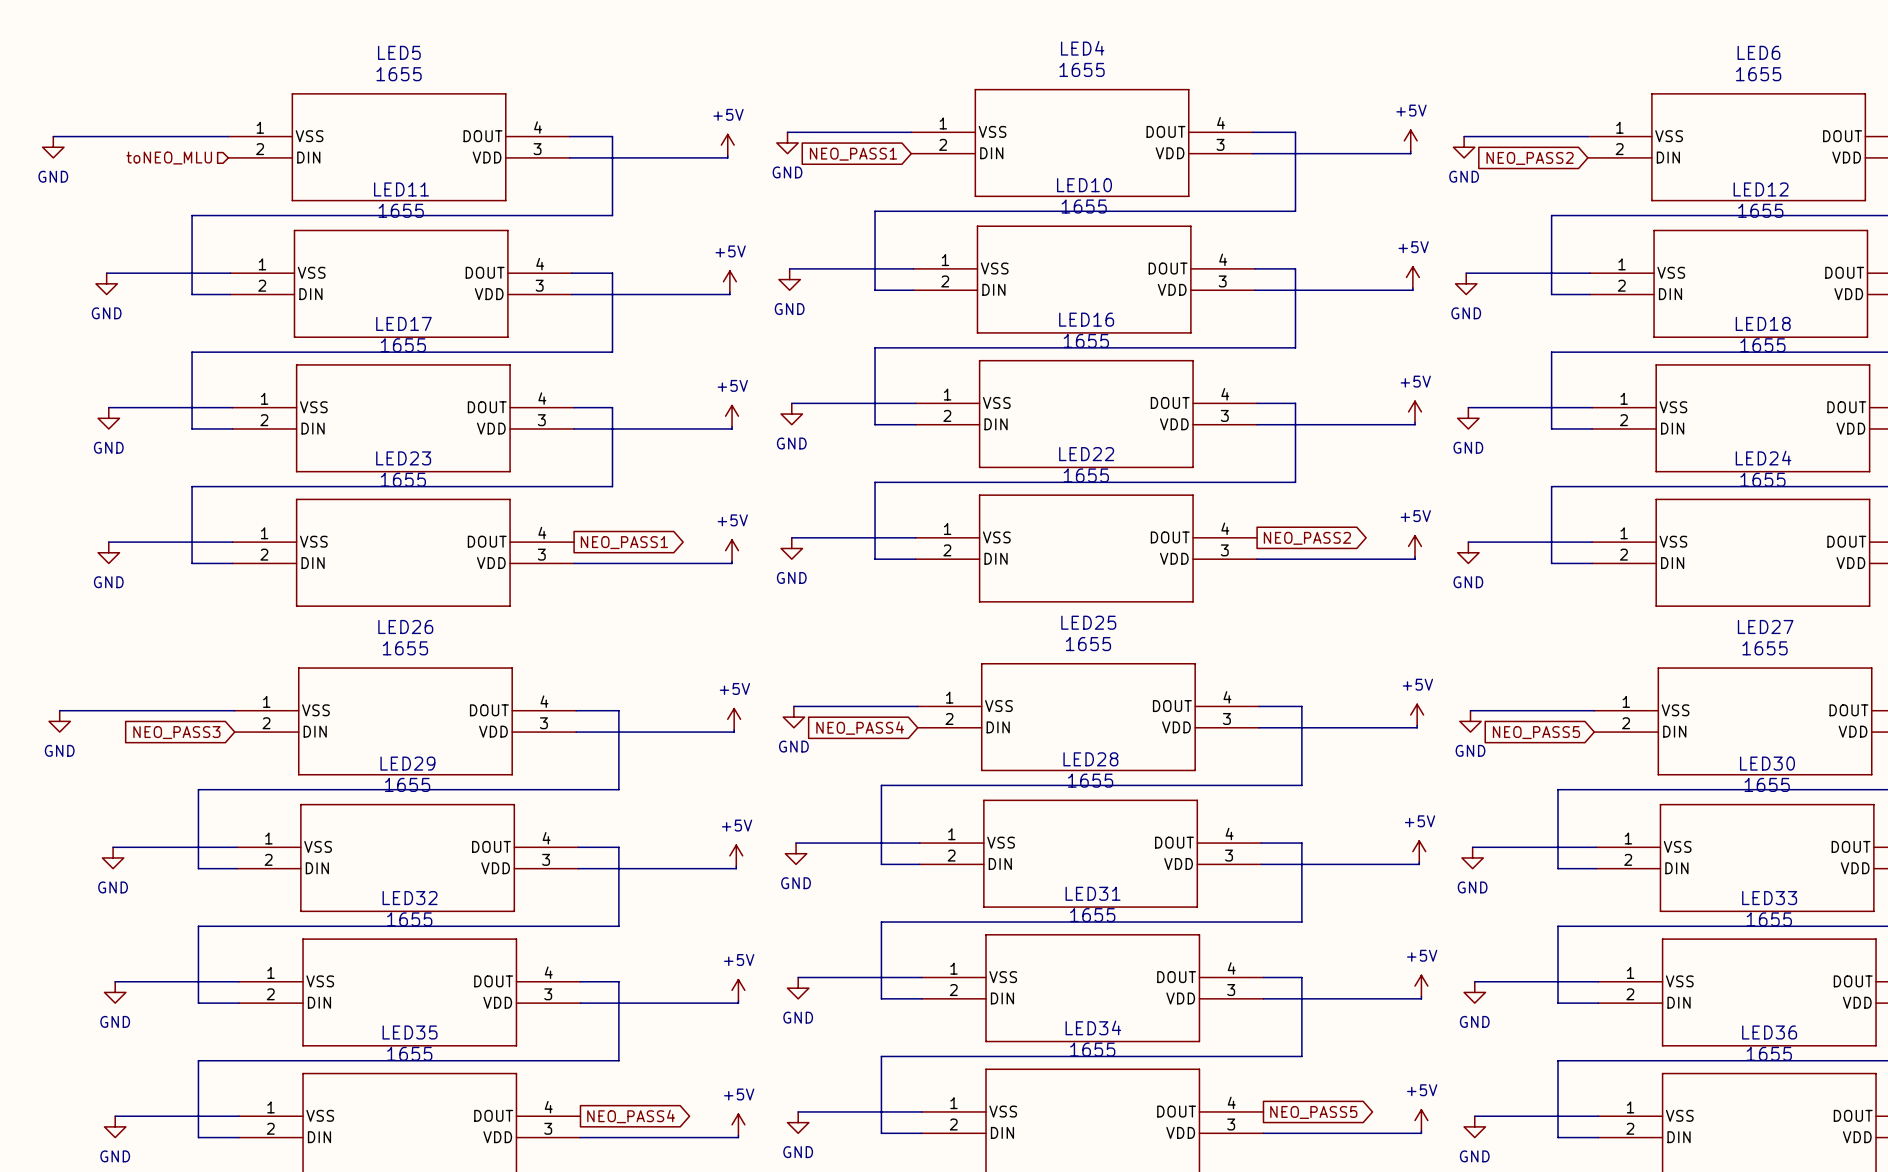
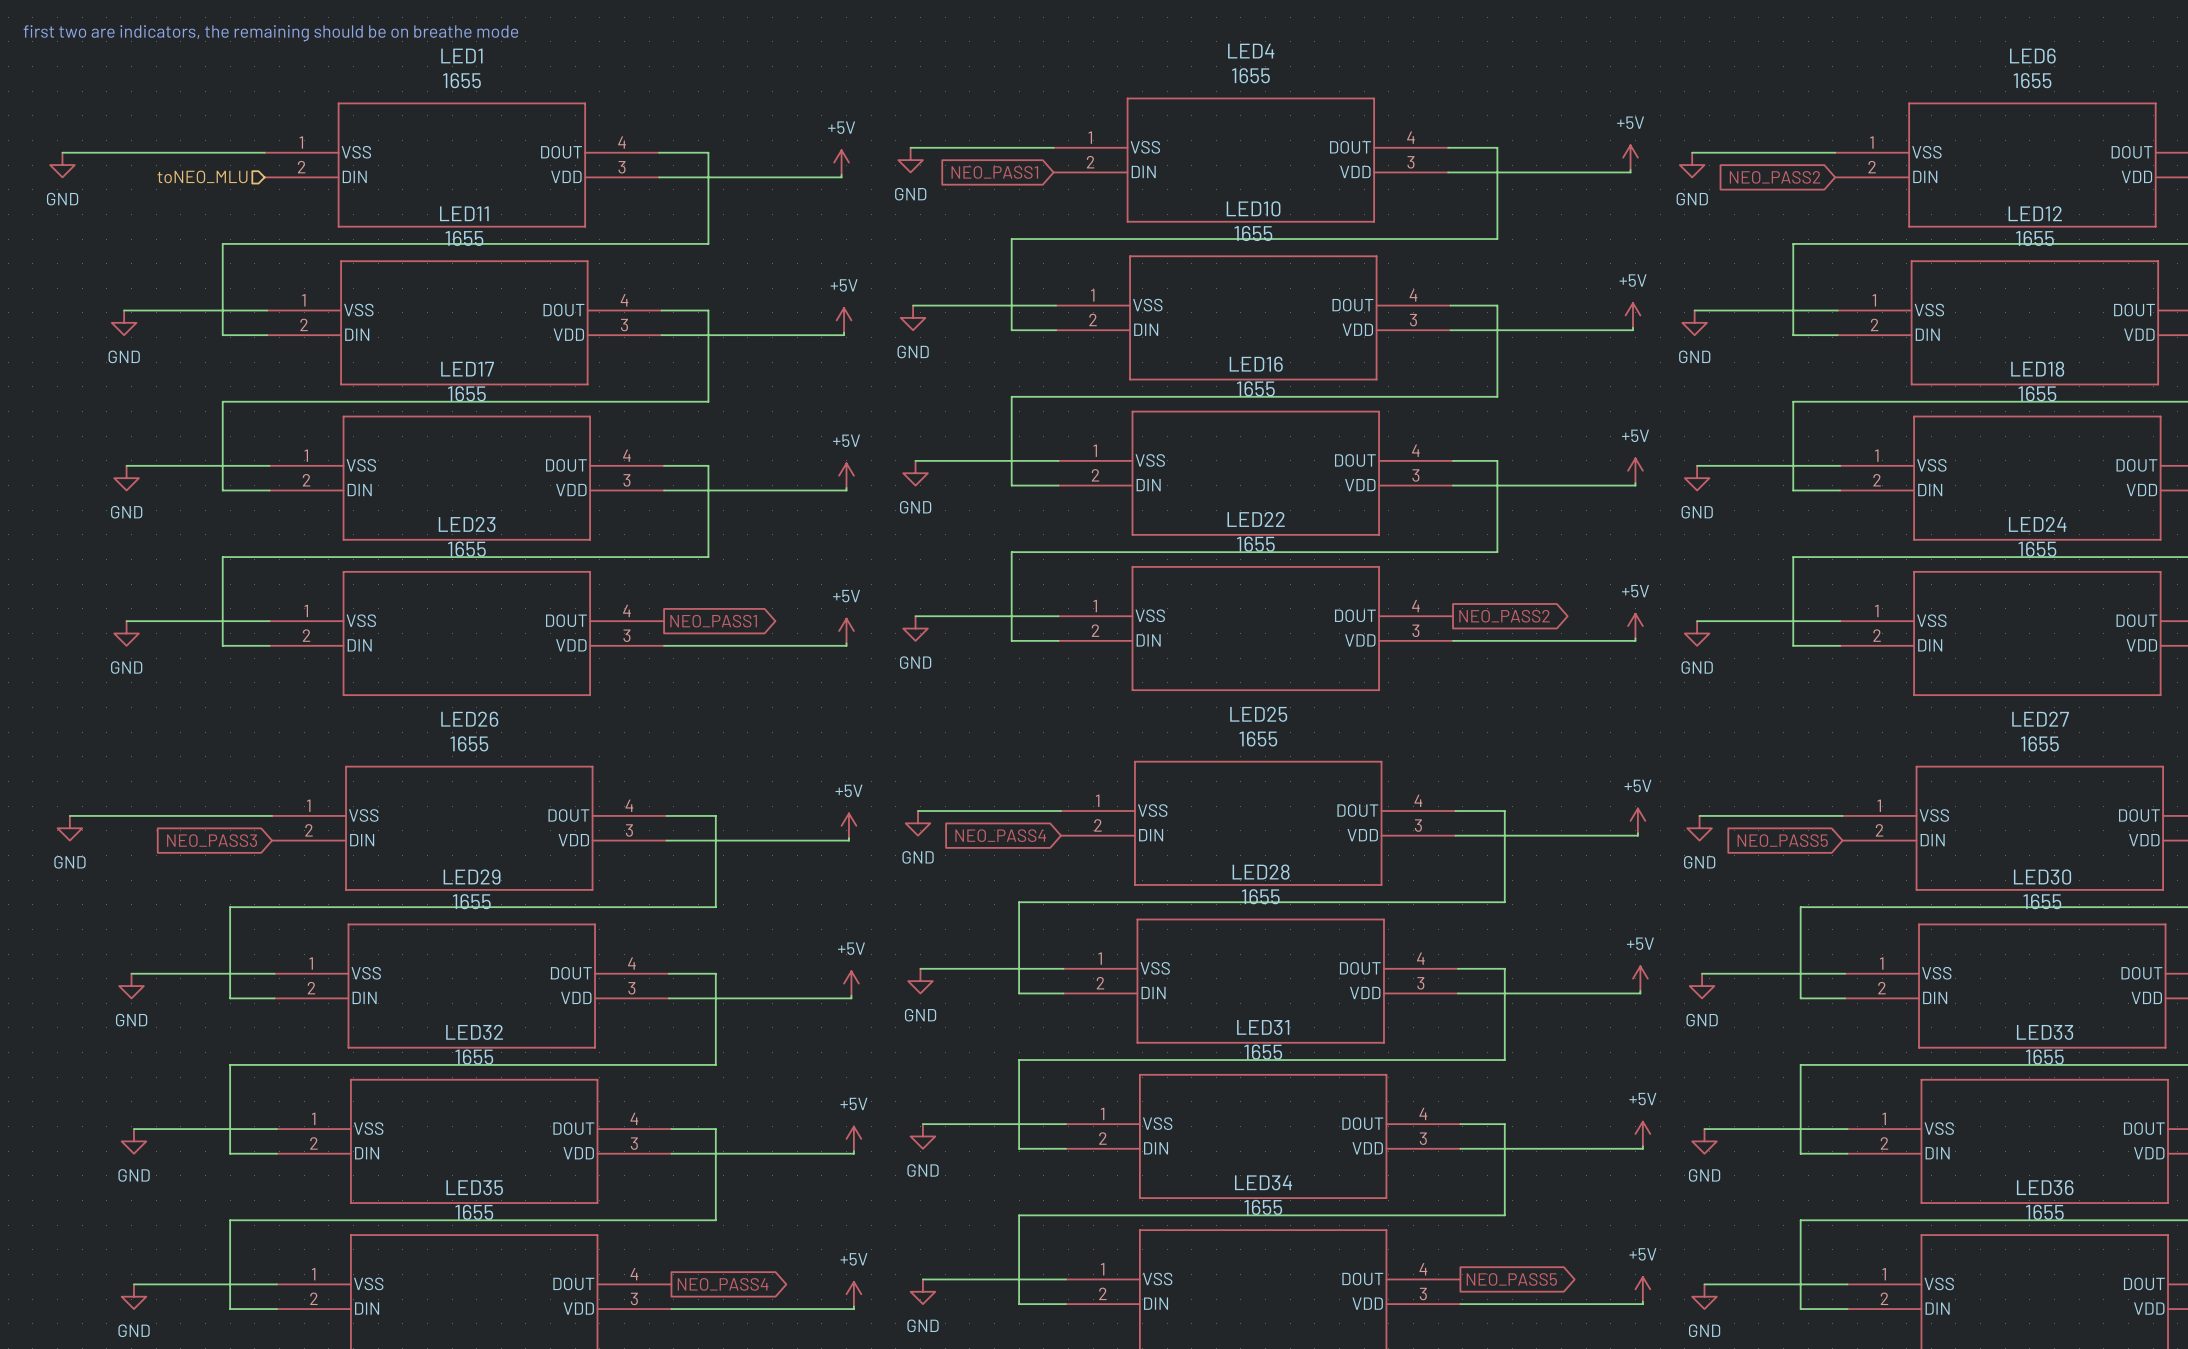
text: none -> first two are indicators, the remaining should be on breathe mode (270, 33)
LED5 name: LED5 (399, 52) -> LED1 (461, 56)

